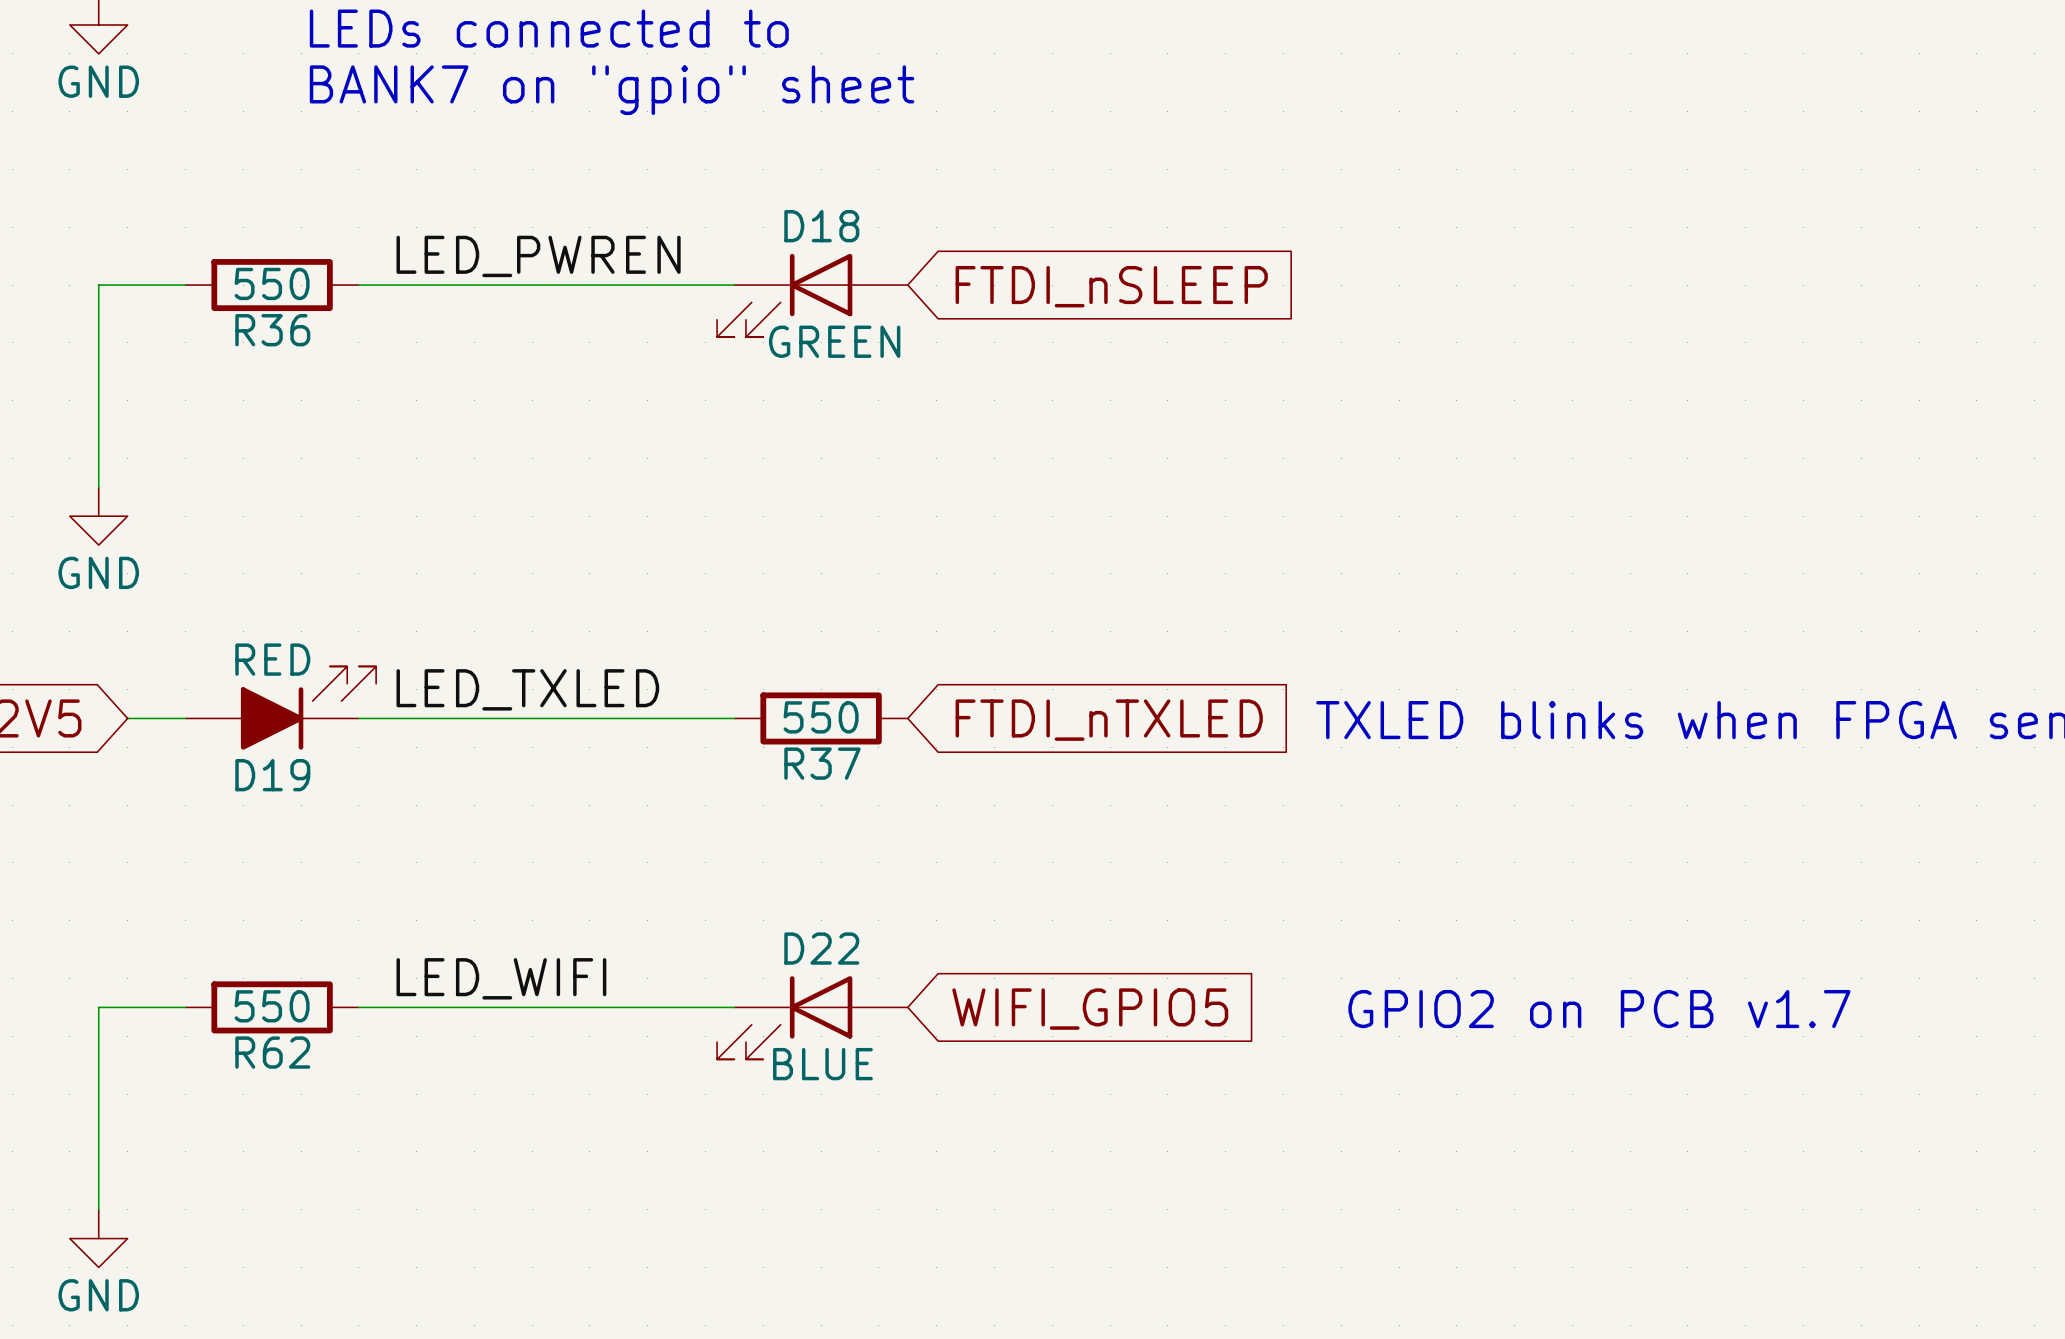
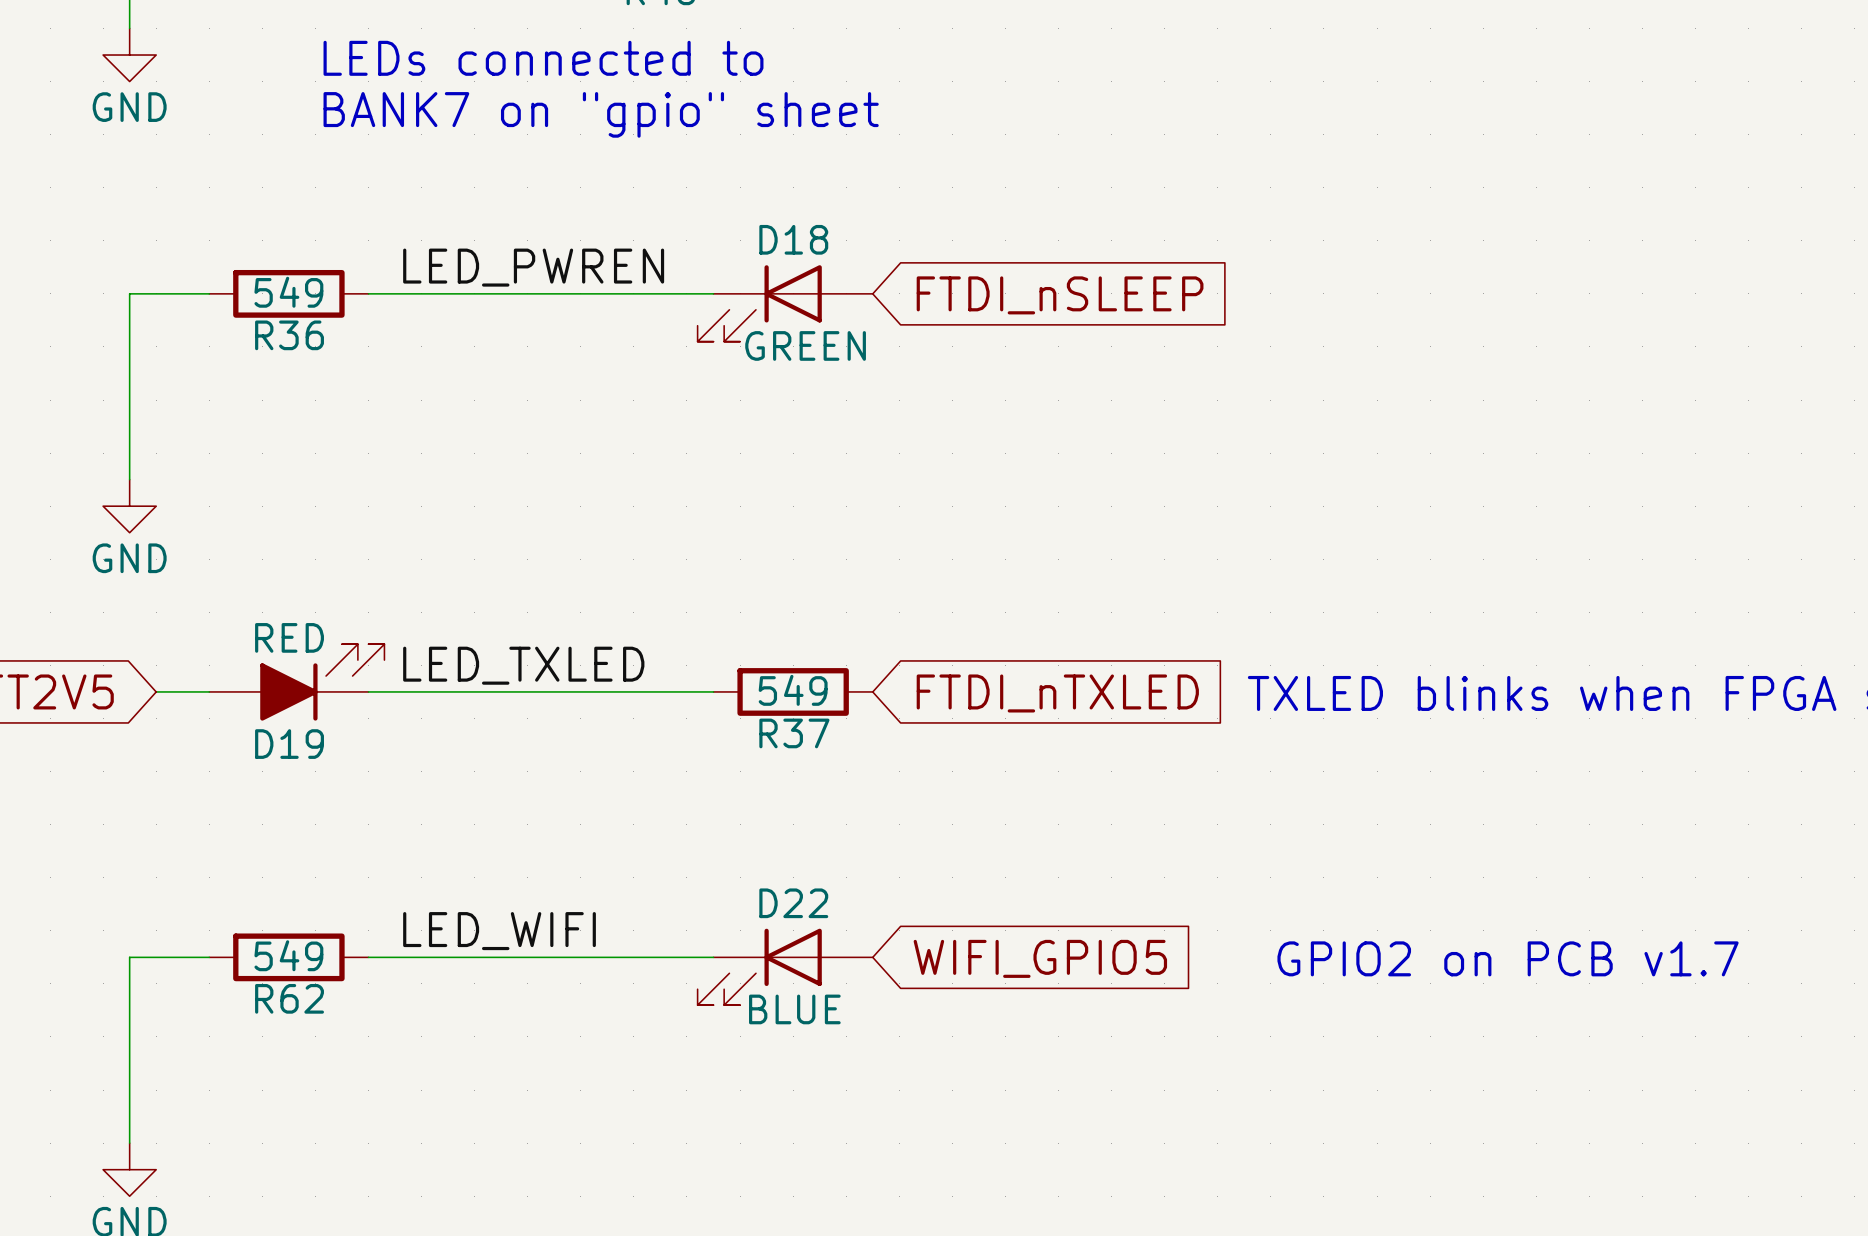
R36 value: 550 (272, 283) -> 549 (288, 292)
R37 value: 550 (821, 717) -> 549 (793, 690)
R62 value: 550 (272, 1006) -> 549 (288, 955)

